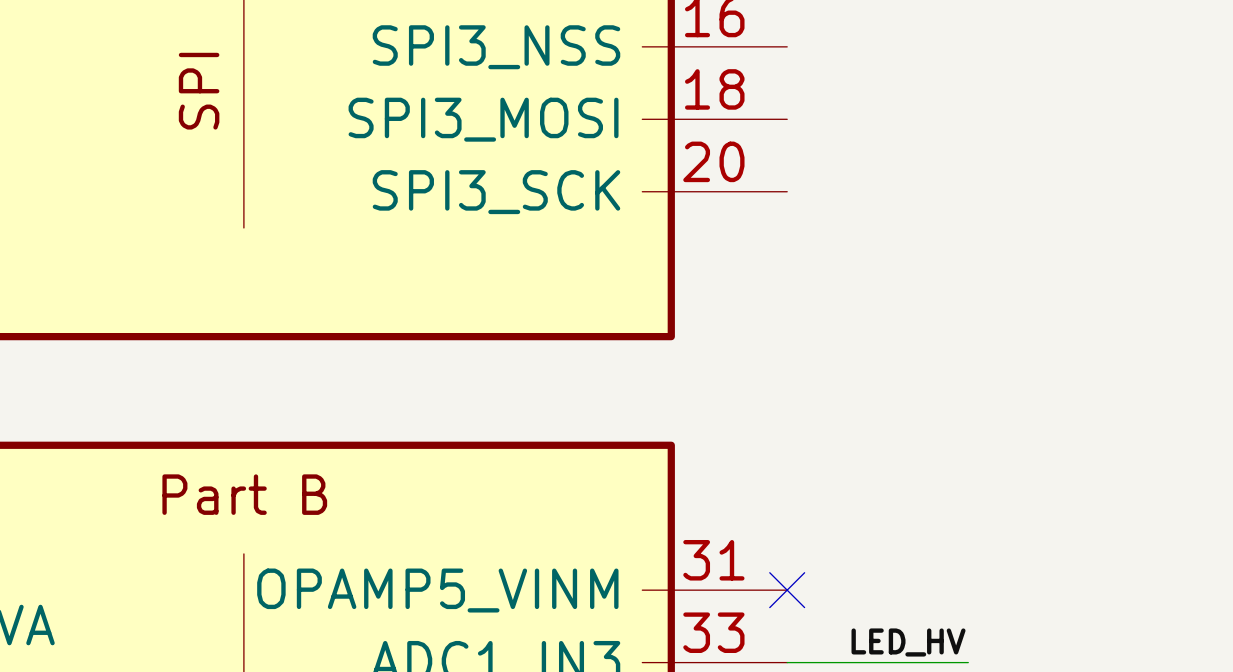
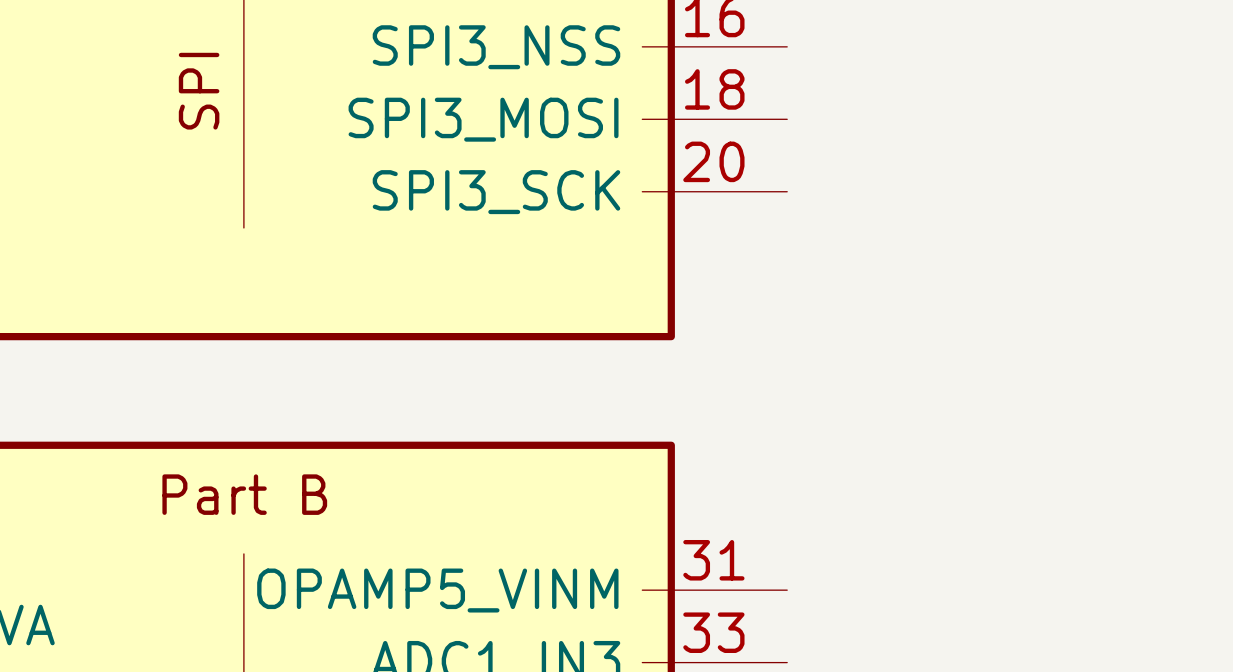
no-connect mark: (787, 590) -> none
label: LED_HV (908, 642) -> none
wire: (787, 662) (968, 662) -> none

